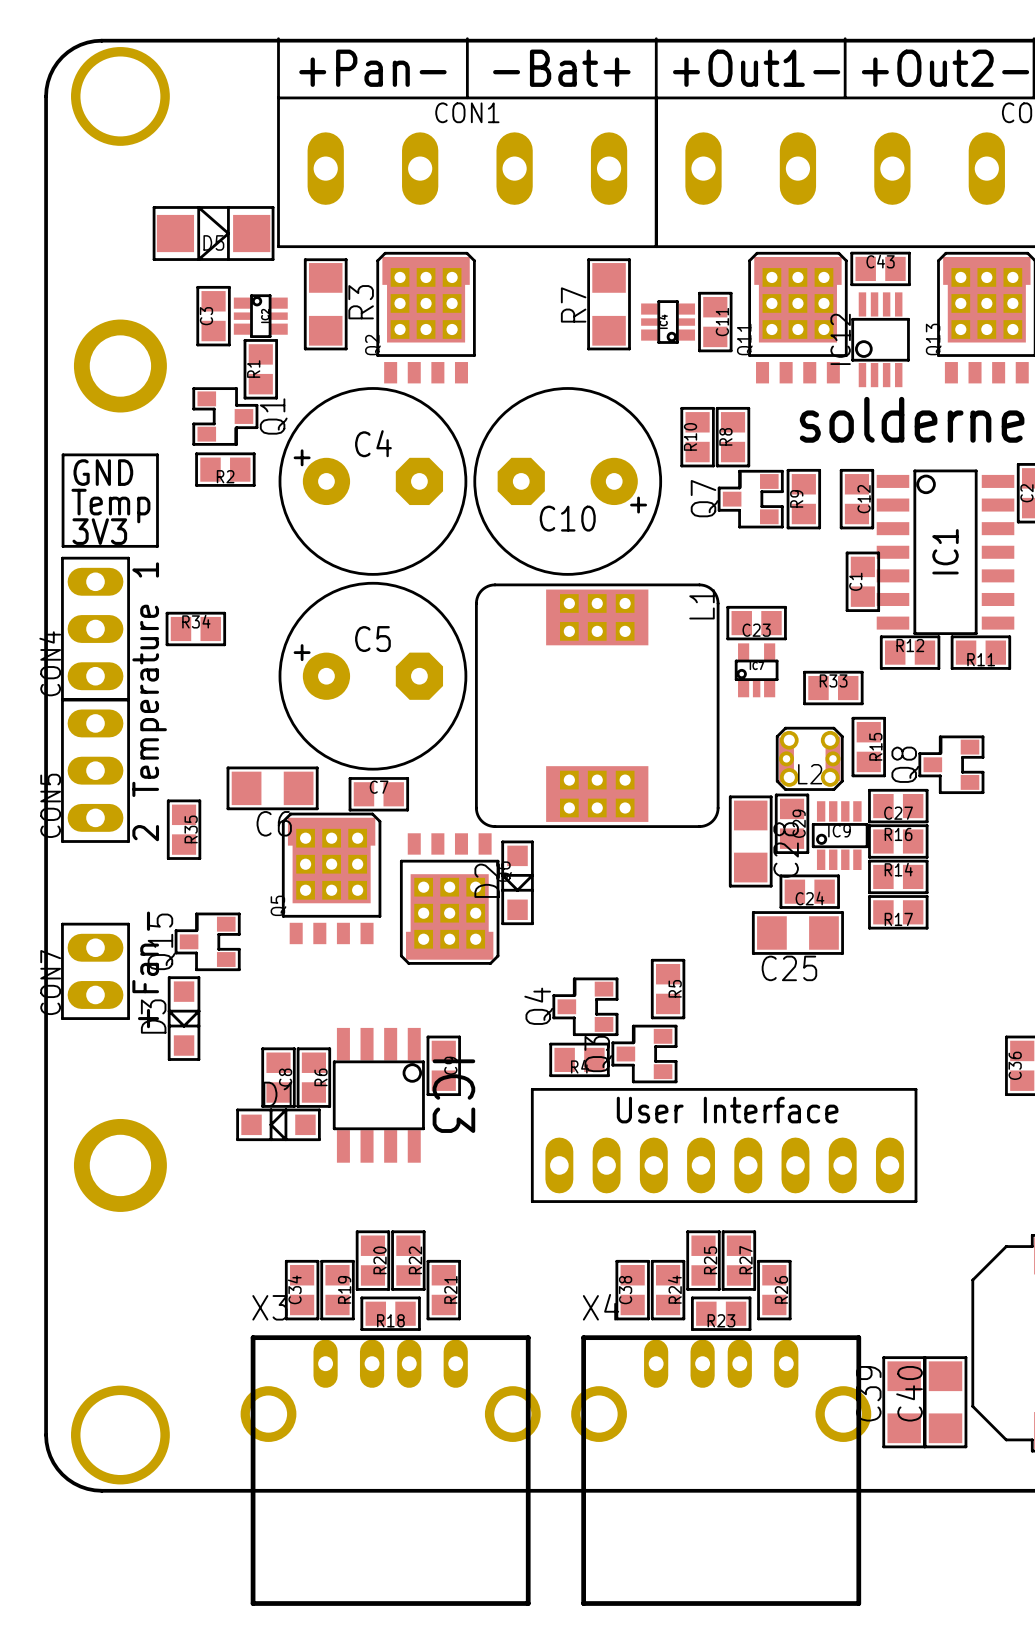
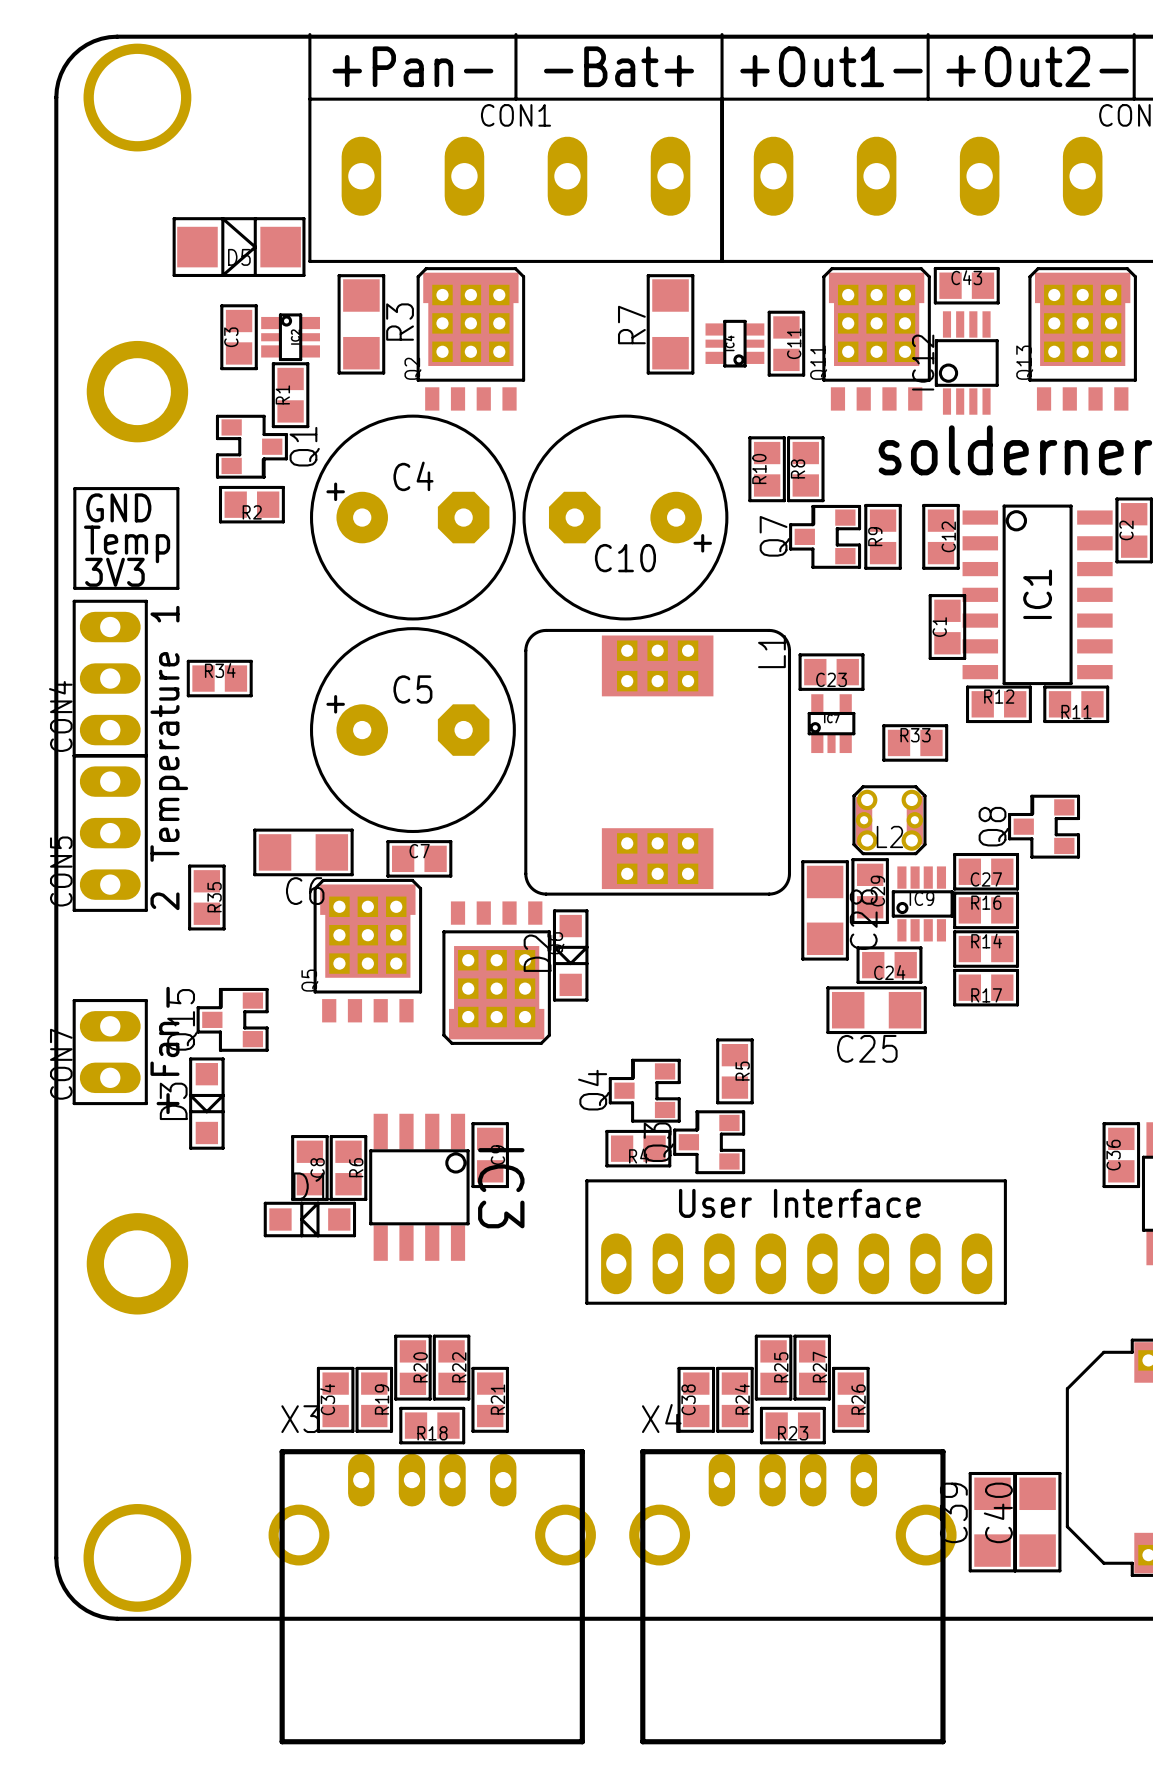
R15: (868, 747) -> none

